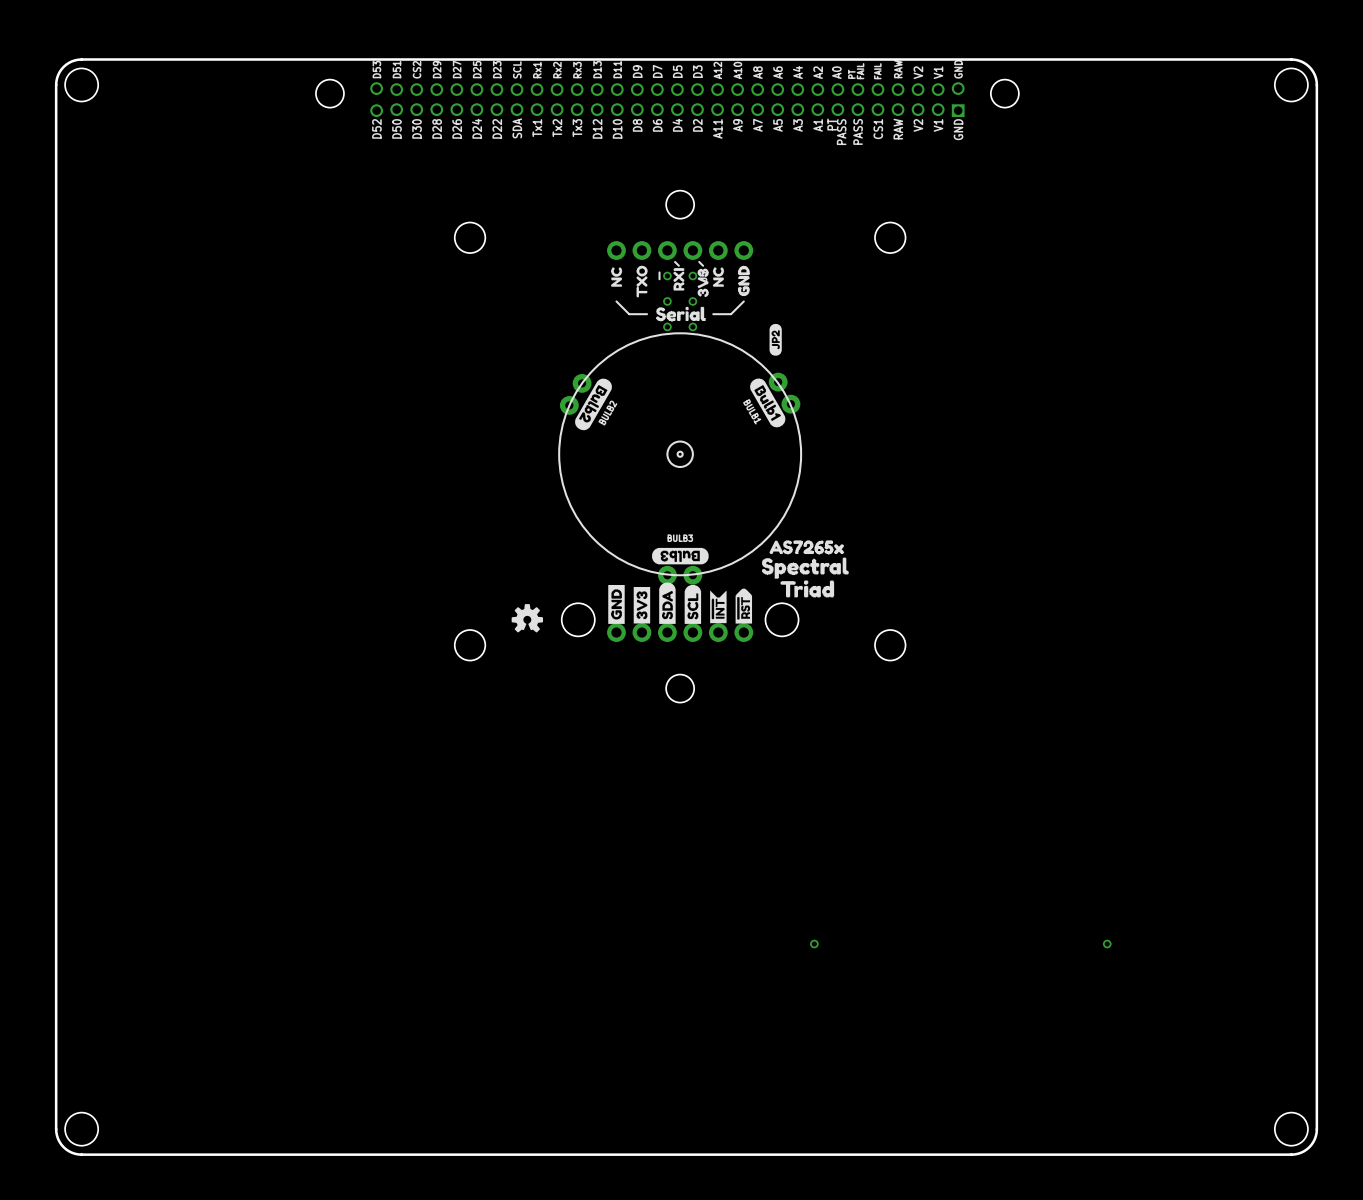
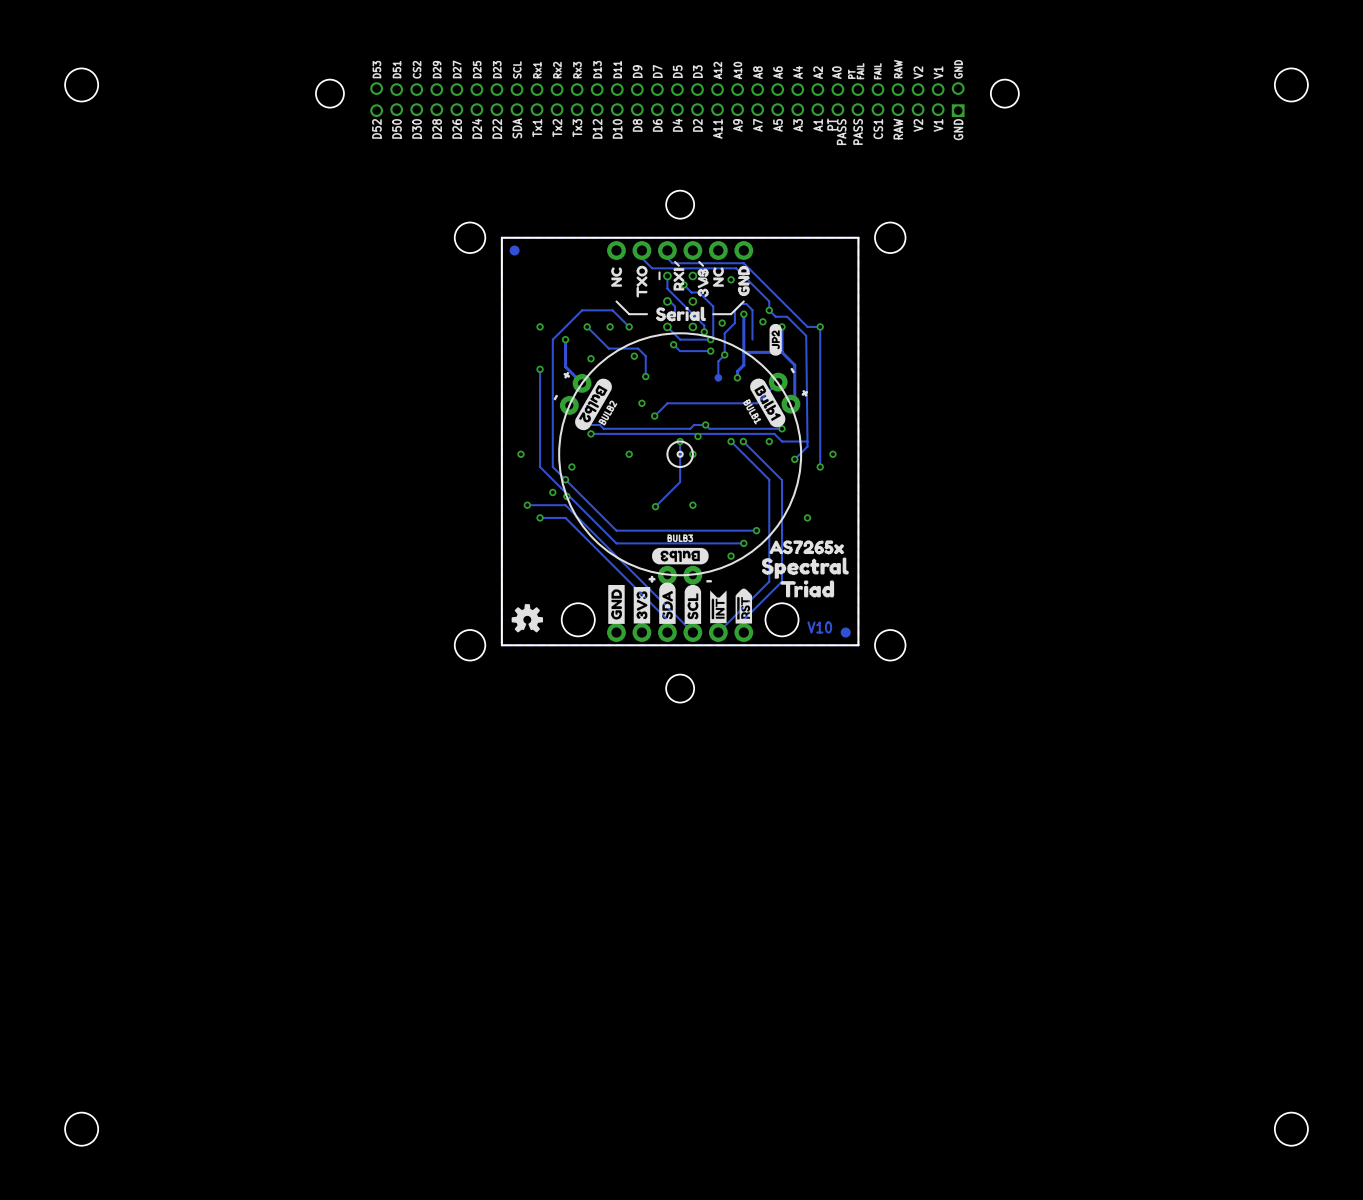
board edge: (1291, 59) (81, 59) (71, 61) (63, 66) (58, 75) (56, 84) (56, 1129) (58, 1138) (63, 1147) (71, 1152) (81, 1154) (1291, 1154) (1301, 1152) (1309, 1147) (1314, 1138) (1316, 1129) (1316, 84) (1314, 75) (1309, 66) (1301, 61) (1291, 59) -> none
board edge: none -> (858, 237) (858, 645) (501, 645) (501, 237) (858, 237)
part: none -> (514, 250)
track: none -> (641, 250) (641, 258) (652, 268) (736, 268) (769, 301) (769, 310) (775, 316) (787, 316) (806, 335) (807, 441)
track: none -> (667, 250) (667, 258) (672, 263) (743, 263) (807, 326) (820, 326) (820, 466)
track: none -> (667, 275) (667, 288) (704, 325) (704, 332)
via: none -> (731, 279)
track: none -> (683, 284) (691, 292) (699, 292) (713, 306) (713, 337) (710, 339) (680, 339) (667, 326)
via: none -> (683, 284)
track: none -> (667, 301) (675, 306) (675, 316)
via: none -> (769, 310)
track: none -> (743, 314) (743, 365) (737, 371) (737, 377)
via: none -> (743, 314)
via: none -> (762, 321)
via: none -> (722, 323)
via: none -> (540, 326)
track: none -> (587, 326) (608, 348) (638, 348) (645, 356) (645, 376)
via: none -> (587, 326)
via: none -> (610, 326)
track: none -> (629, 326) (612, 310) (582, 310) (552, 339) (552, 466) (616, 530) (756, 530)
via: none -> (629, 326)
track: none -> (782, 326) (782, 352)
via: none -> (782, 326)
via: none -> (820, 326)
via: none -> (704, 332)
track: none -> (565, 339) (565, 366) (582, 383)
via: none -> (565, 339)
via: none -> (710, 339)
track: none -> (752, 339) (752, 310) (746, 303) (741, 303) (734, 310) (734, 323) (724, 333) (724, 354) (718, 361) (718, 377)
track: none -> (673, 344) (679, 351) (710, 351)
via: none -> (673, 344)
via: none -> (710, 351)
track: none -> (782, 352) (743, 352)
track: none -> (782, 352) (794, 365) (794, 400) (790, 404)
via: none -> (724, 354)
via: none -> (634, 356)
via: none -> (591, 358)
drawing: none -> [790, 367, 795, 374]
track: none -> (540, 369) (540, 466) (566, 493) (566, 496)
via: none -> (540, 369)
drawing: none -> [563, 371, 571, 379]
via: none -> (645, 376)
part: none -> (718, 377)
via: none -> (737, 377)
track: none -> (778, 382) (756, 403) (667, 403) (654, 416)
drawing: none -> [801, 389, 809, 397]
drawing: none -> [553, 394, 559, 401]
via: none -> (641, 403)
via: none -> (654, 416)
track: none -> (578, 424) (599, 424) (603, 428) (690, 428) (694, 424) (705, 424) (709, 428) (782, 428)
via: none -> (705, 424)
via: none -> (782, 428)
track: none -> (591, 433) (695, 433) (697, 436) (700, 433) (774, 433) (782, 441) (807, 441)
via: none -> (591, 433)
via: none -> (697, 436)
track: none -> (680, 441) (680, 482) (655, 506)
via: none -> (680, 441)
track: none -> (731, 441) (769, 479) (769, 581) (718, 632)
via: none -> (731, 441)
track: none -> (743, 441) (782, 480) (782, 581) (743, 619) (743, 632)
via: none -> (743, 441)
via: none -> (769, 441)
track: none -> (807, 441) (807, 446) (794, 459)
via: none -> (520, 454)
via: none -> (629, 454)
via: none -> (692, 454)
via: none -> (832, 454)
via: none -> (794, 459)
via: none -> (571, 466)
via: none -> (820, 466)
via: none -> (565, 479)
via: none -> (552, 492)
track: none -> (566, 496) (570, 497) (616, 543) (743, 543)
via: none -> (566, 496)
track: none -> (527, 505) (565, 505) (692, 632)
via: none -> (527, 505)
via: none -> (692, 505)
via: none -> (655, 506)
track: none -> (540, 517) (565, 517) (667, 619) (667, 632)
via: none -> (540, 517)
via: none -> (807, 517)
via: none -> (756, 530)
via: none -> (743, 543)
via: none -> (731, 556)
drawing: none -> [648, 575, 656, 583]
drawing: none -> [706, 580, 712, 583]
text: none -> V10 (819, 627)
part: none -> (845, 632)
part: (814, 944) -> none
part: (1107, 944) -> none

